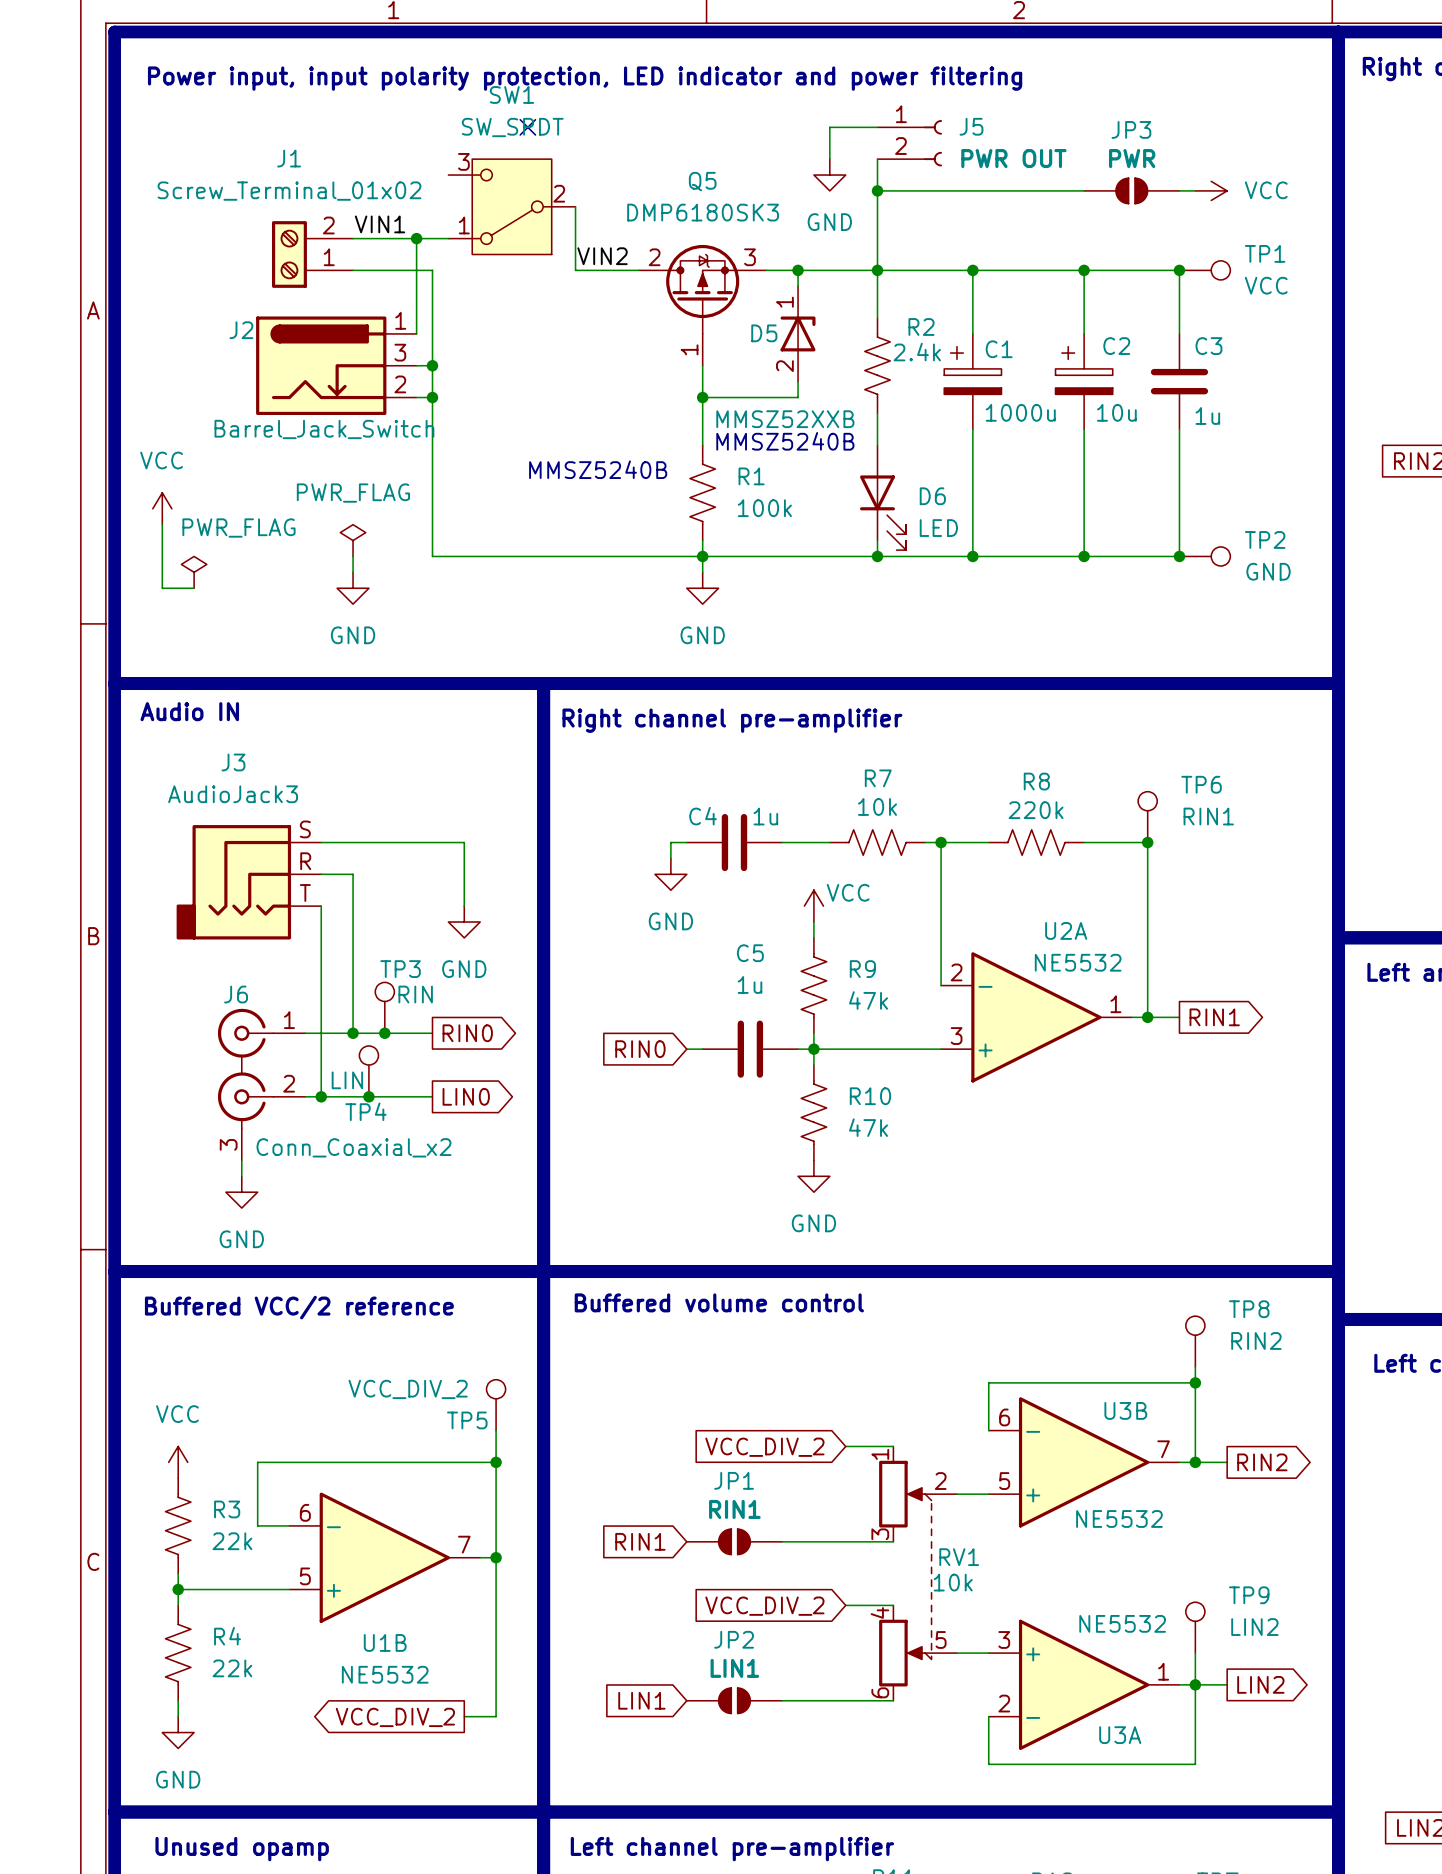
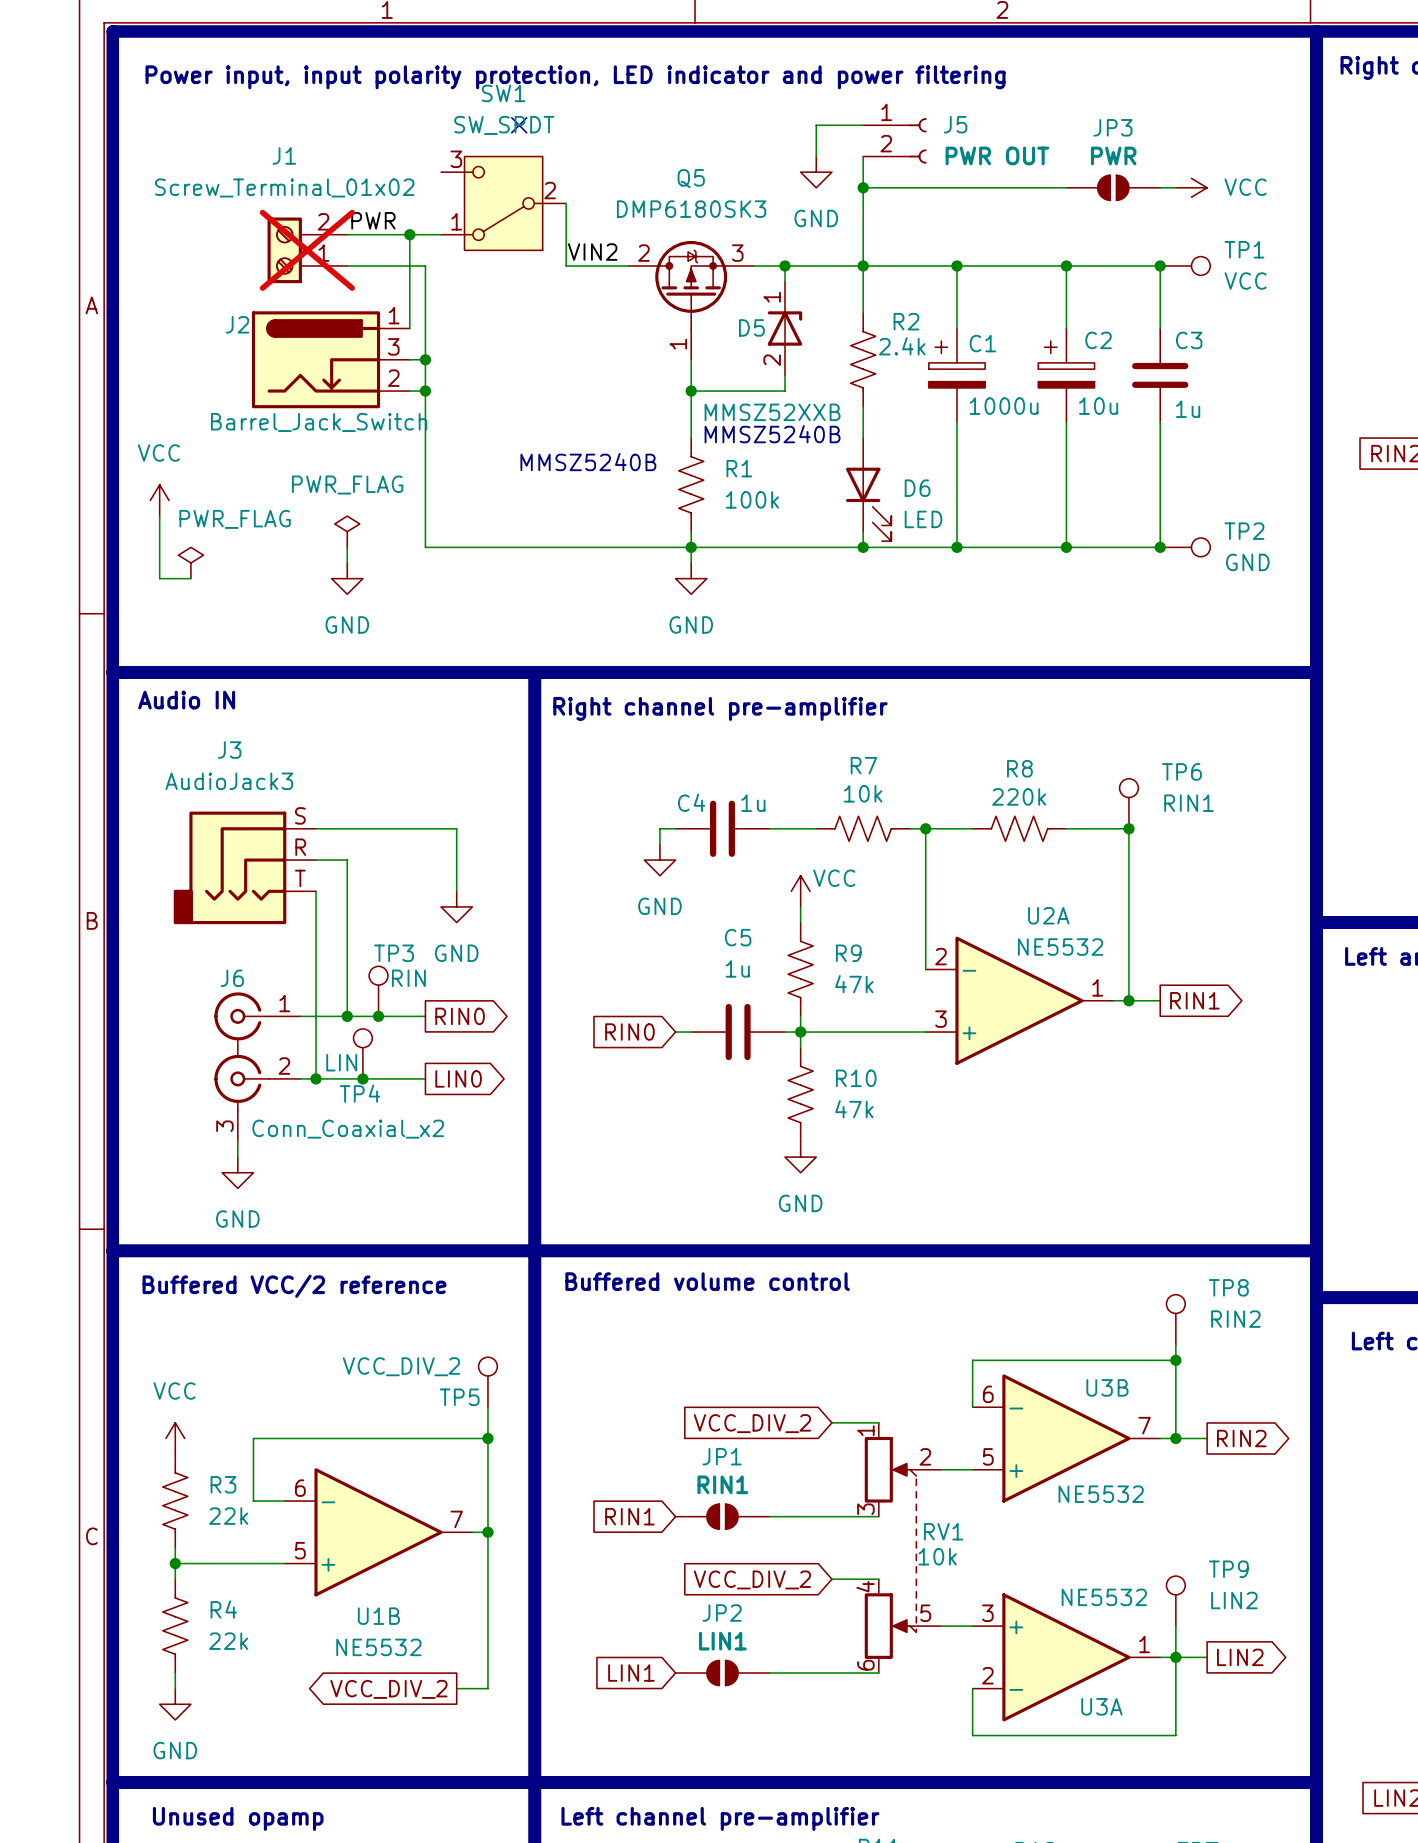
label: VIN1 (380, 224) -> PWR (373, 220)
J1 do-not-place cross: none -> (307, 250)

